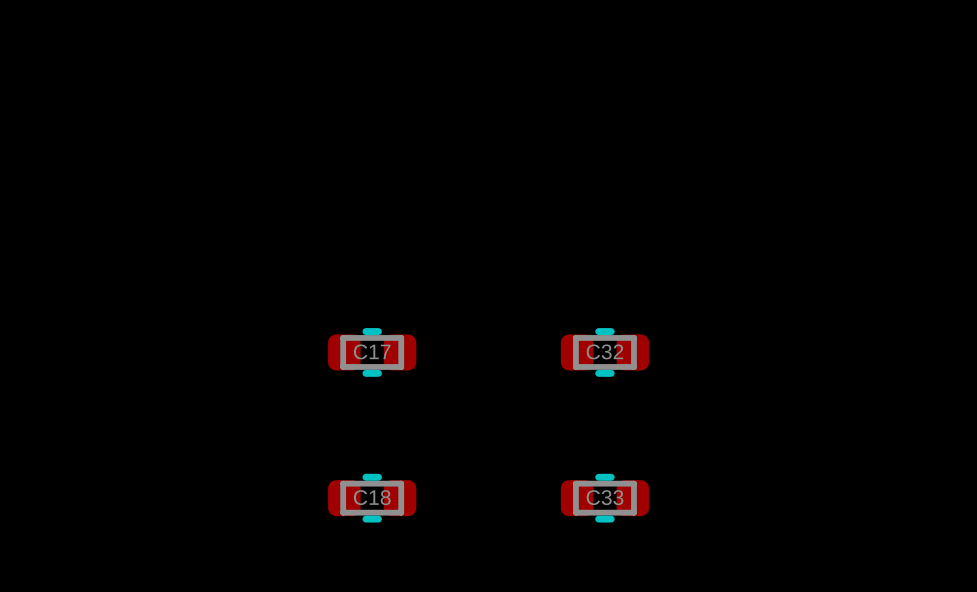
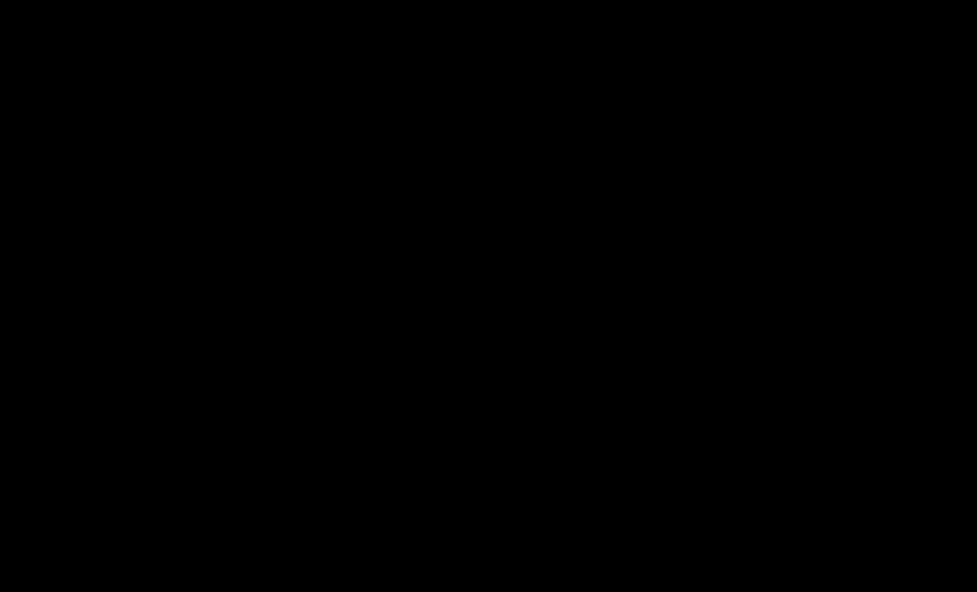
C17: (372, 352) -> none
C32: (604, 352) -> none
C18: (372, 498) -> none
C33: (604, 498) -> none

